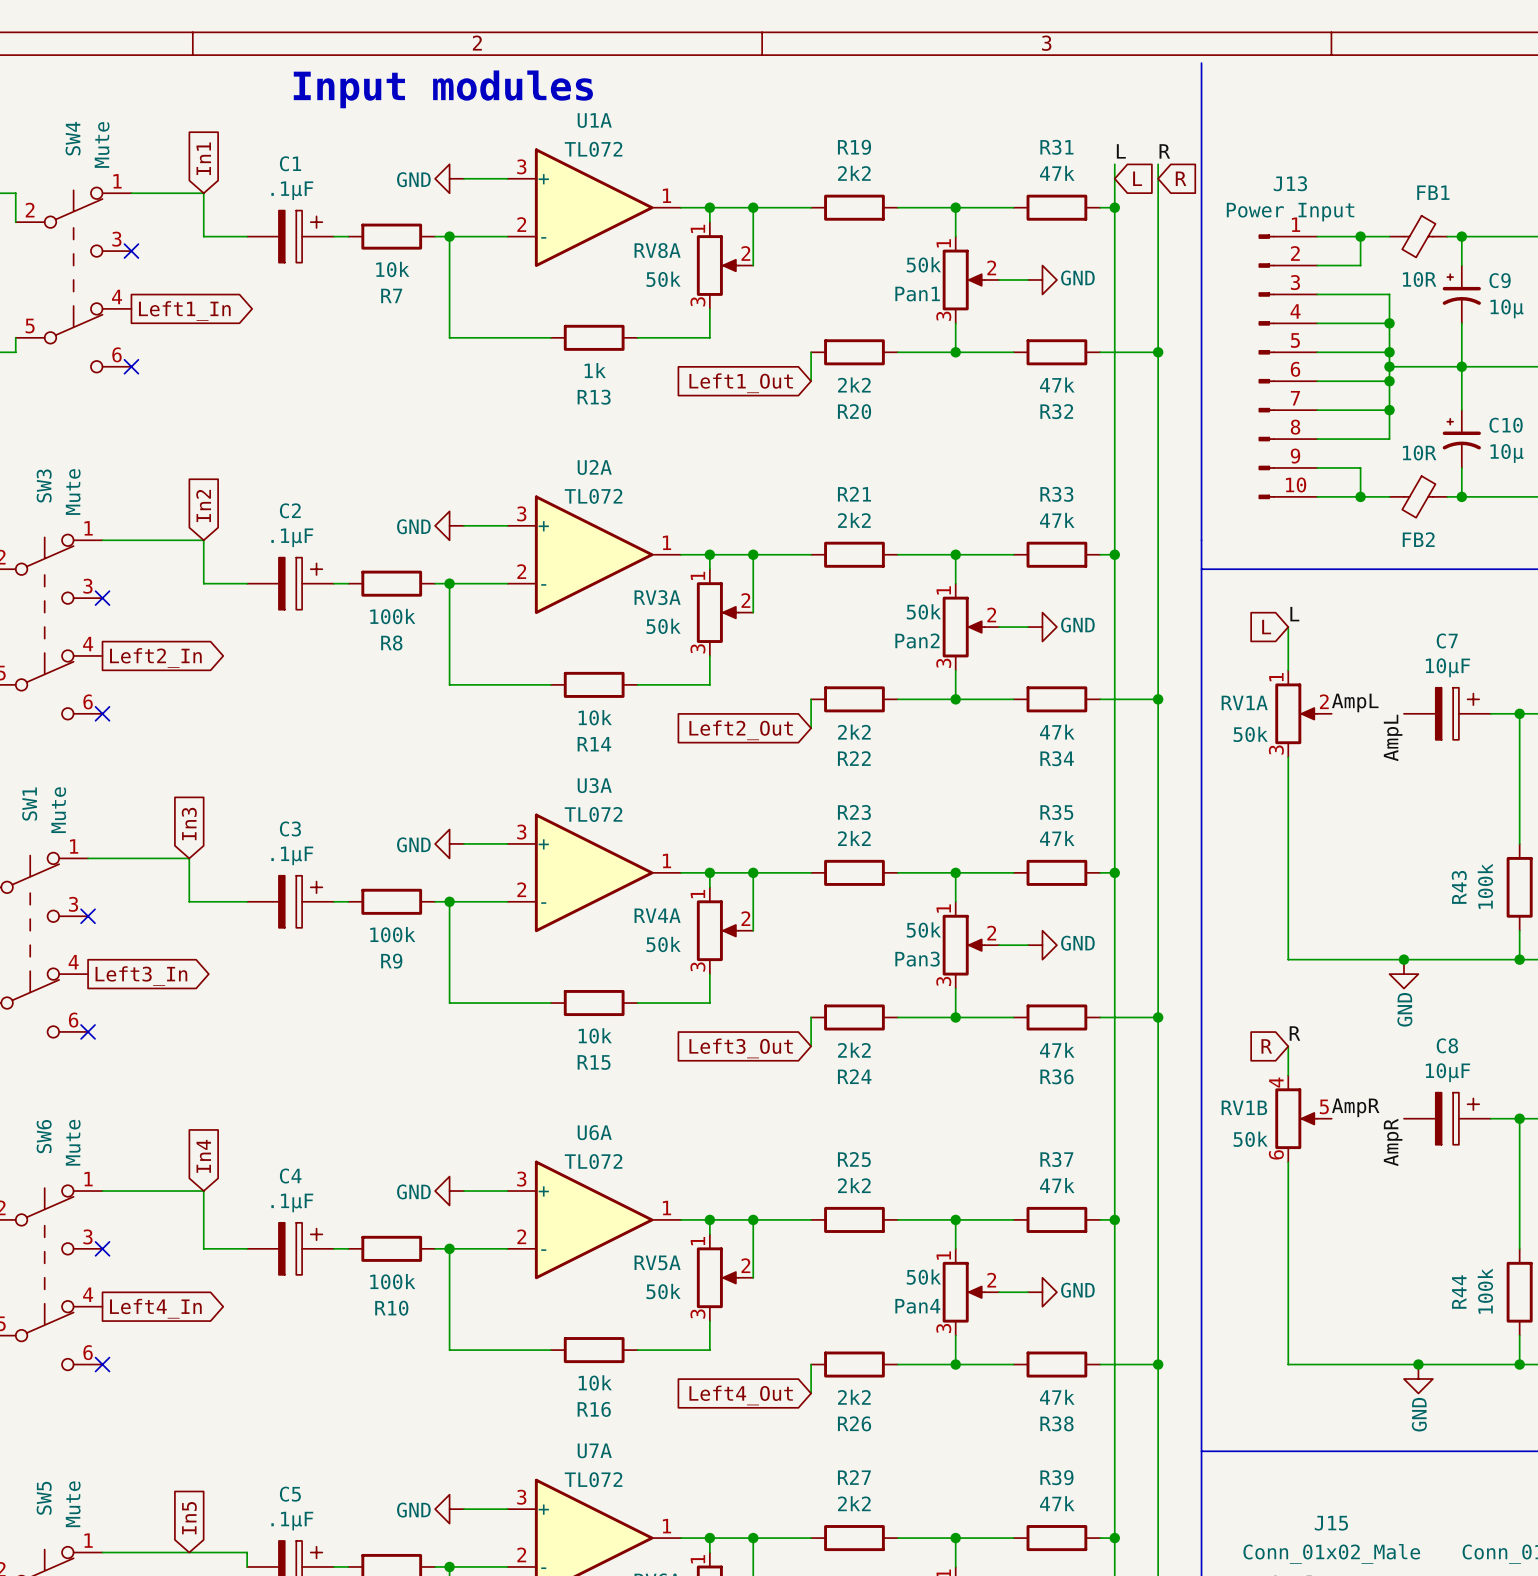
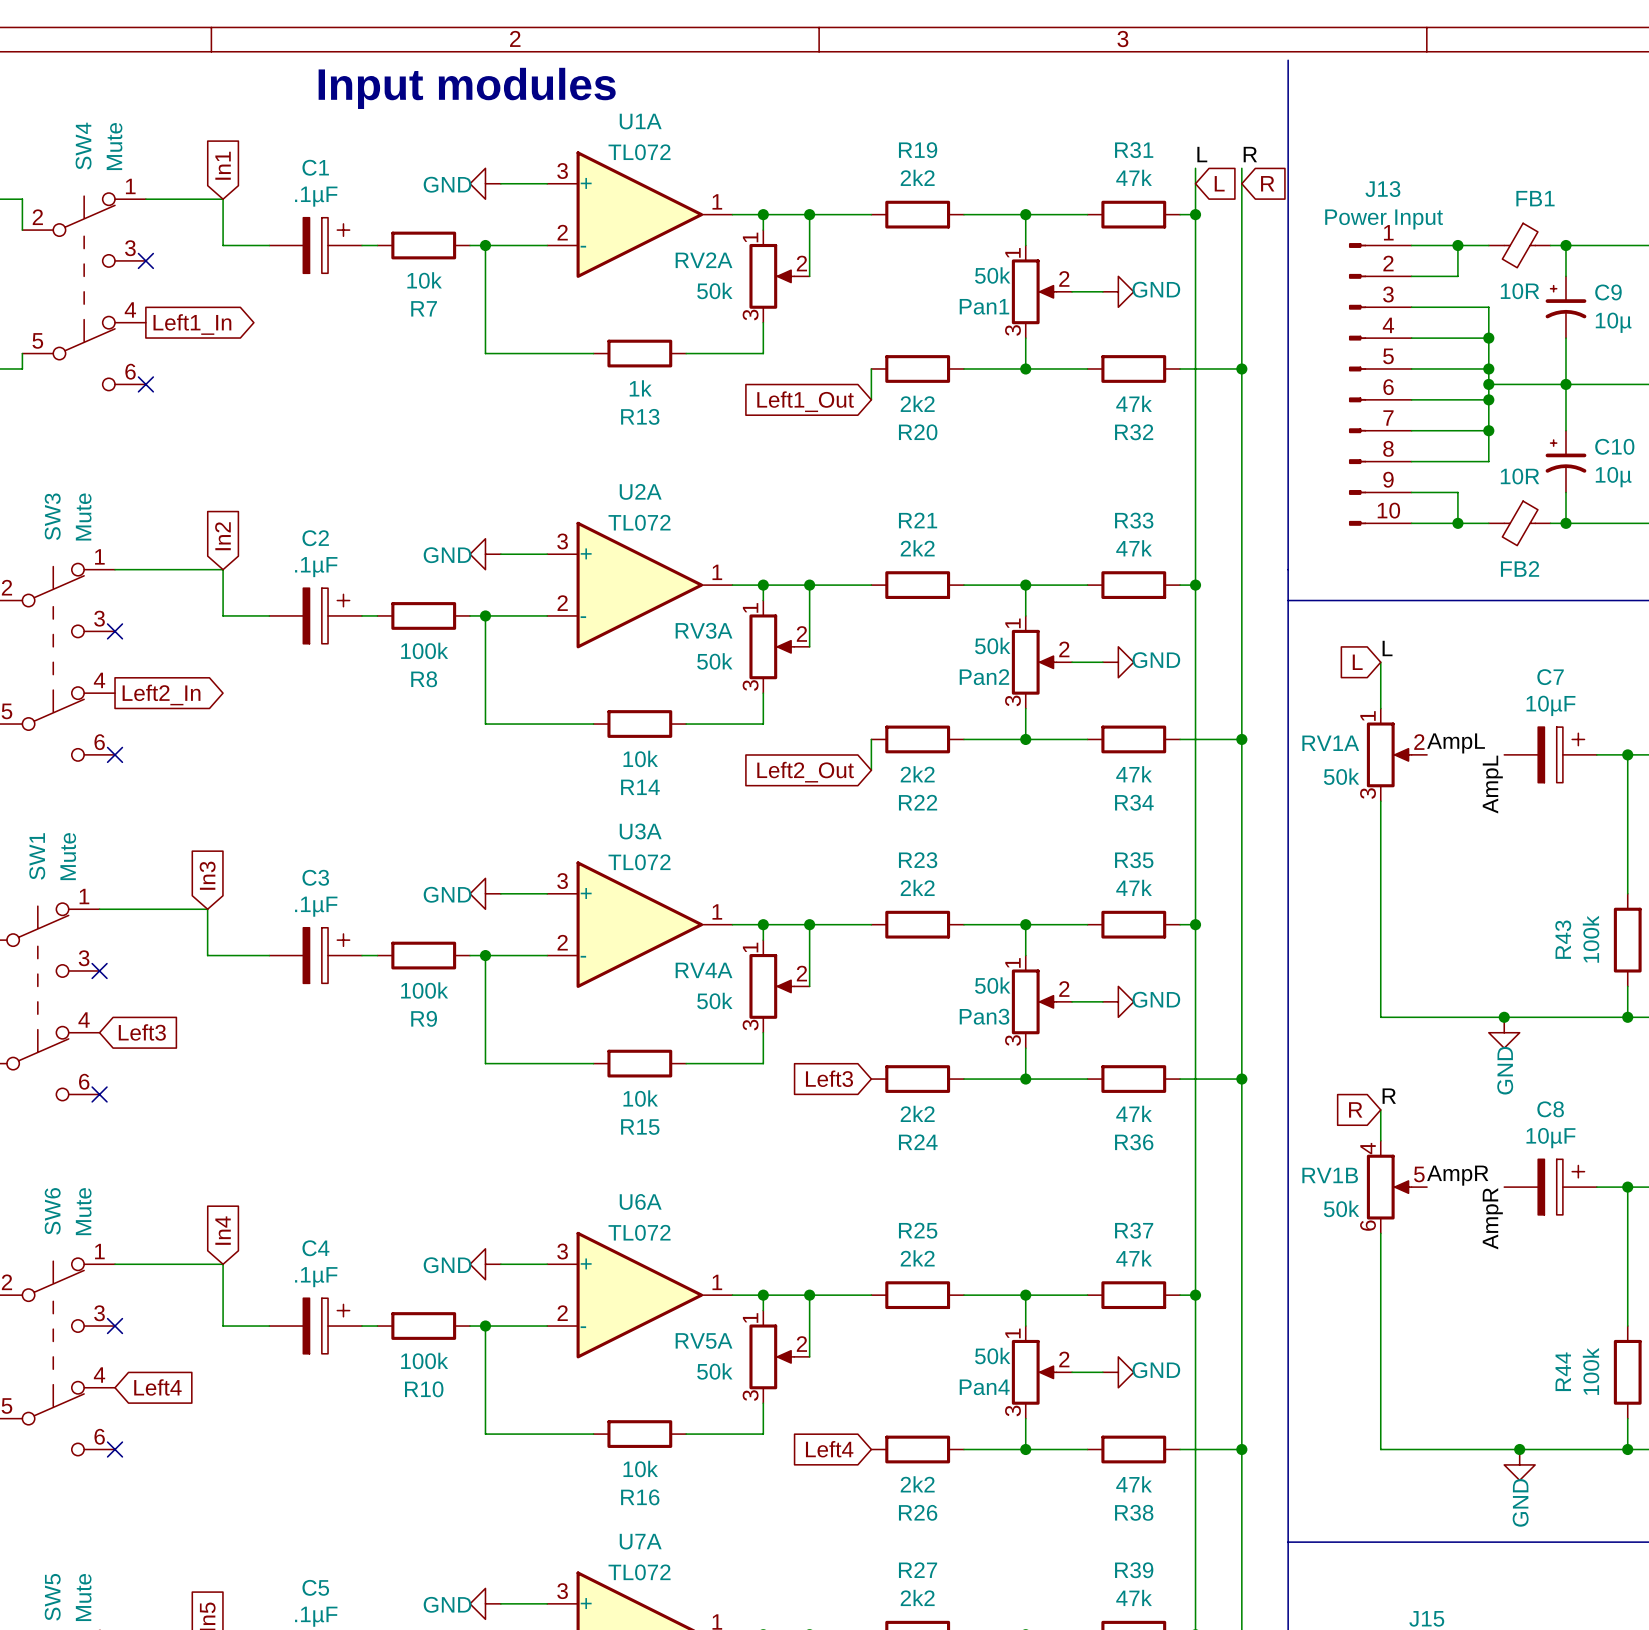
RV8A name: RV8A (657, 250) -> RV2A (704, 260)
global label shape: output (141, 976) -> input (142, 1032)
global label: Left3_In (141, 976) -> Left3 (142, 1032)
wire: (811, 1017) (811, 1046) -> none
global label: Left3_Out (741, 1048) -> Left3 (829, 1078)
global label shape: output (155, 1308) -> input (157, 1387)
global label: Left4_In (155, 1308) -> Left4 (157, 1387)
wire: (811, 1364) (811, 1393) -> none
global label: Left4_Out (741, 1395) -> Left4 (829, 1449)

